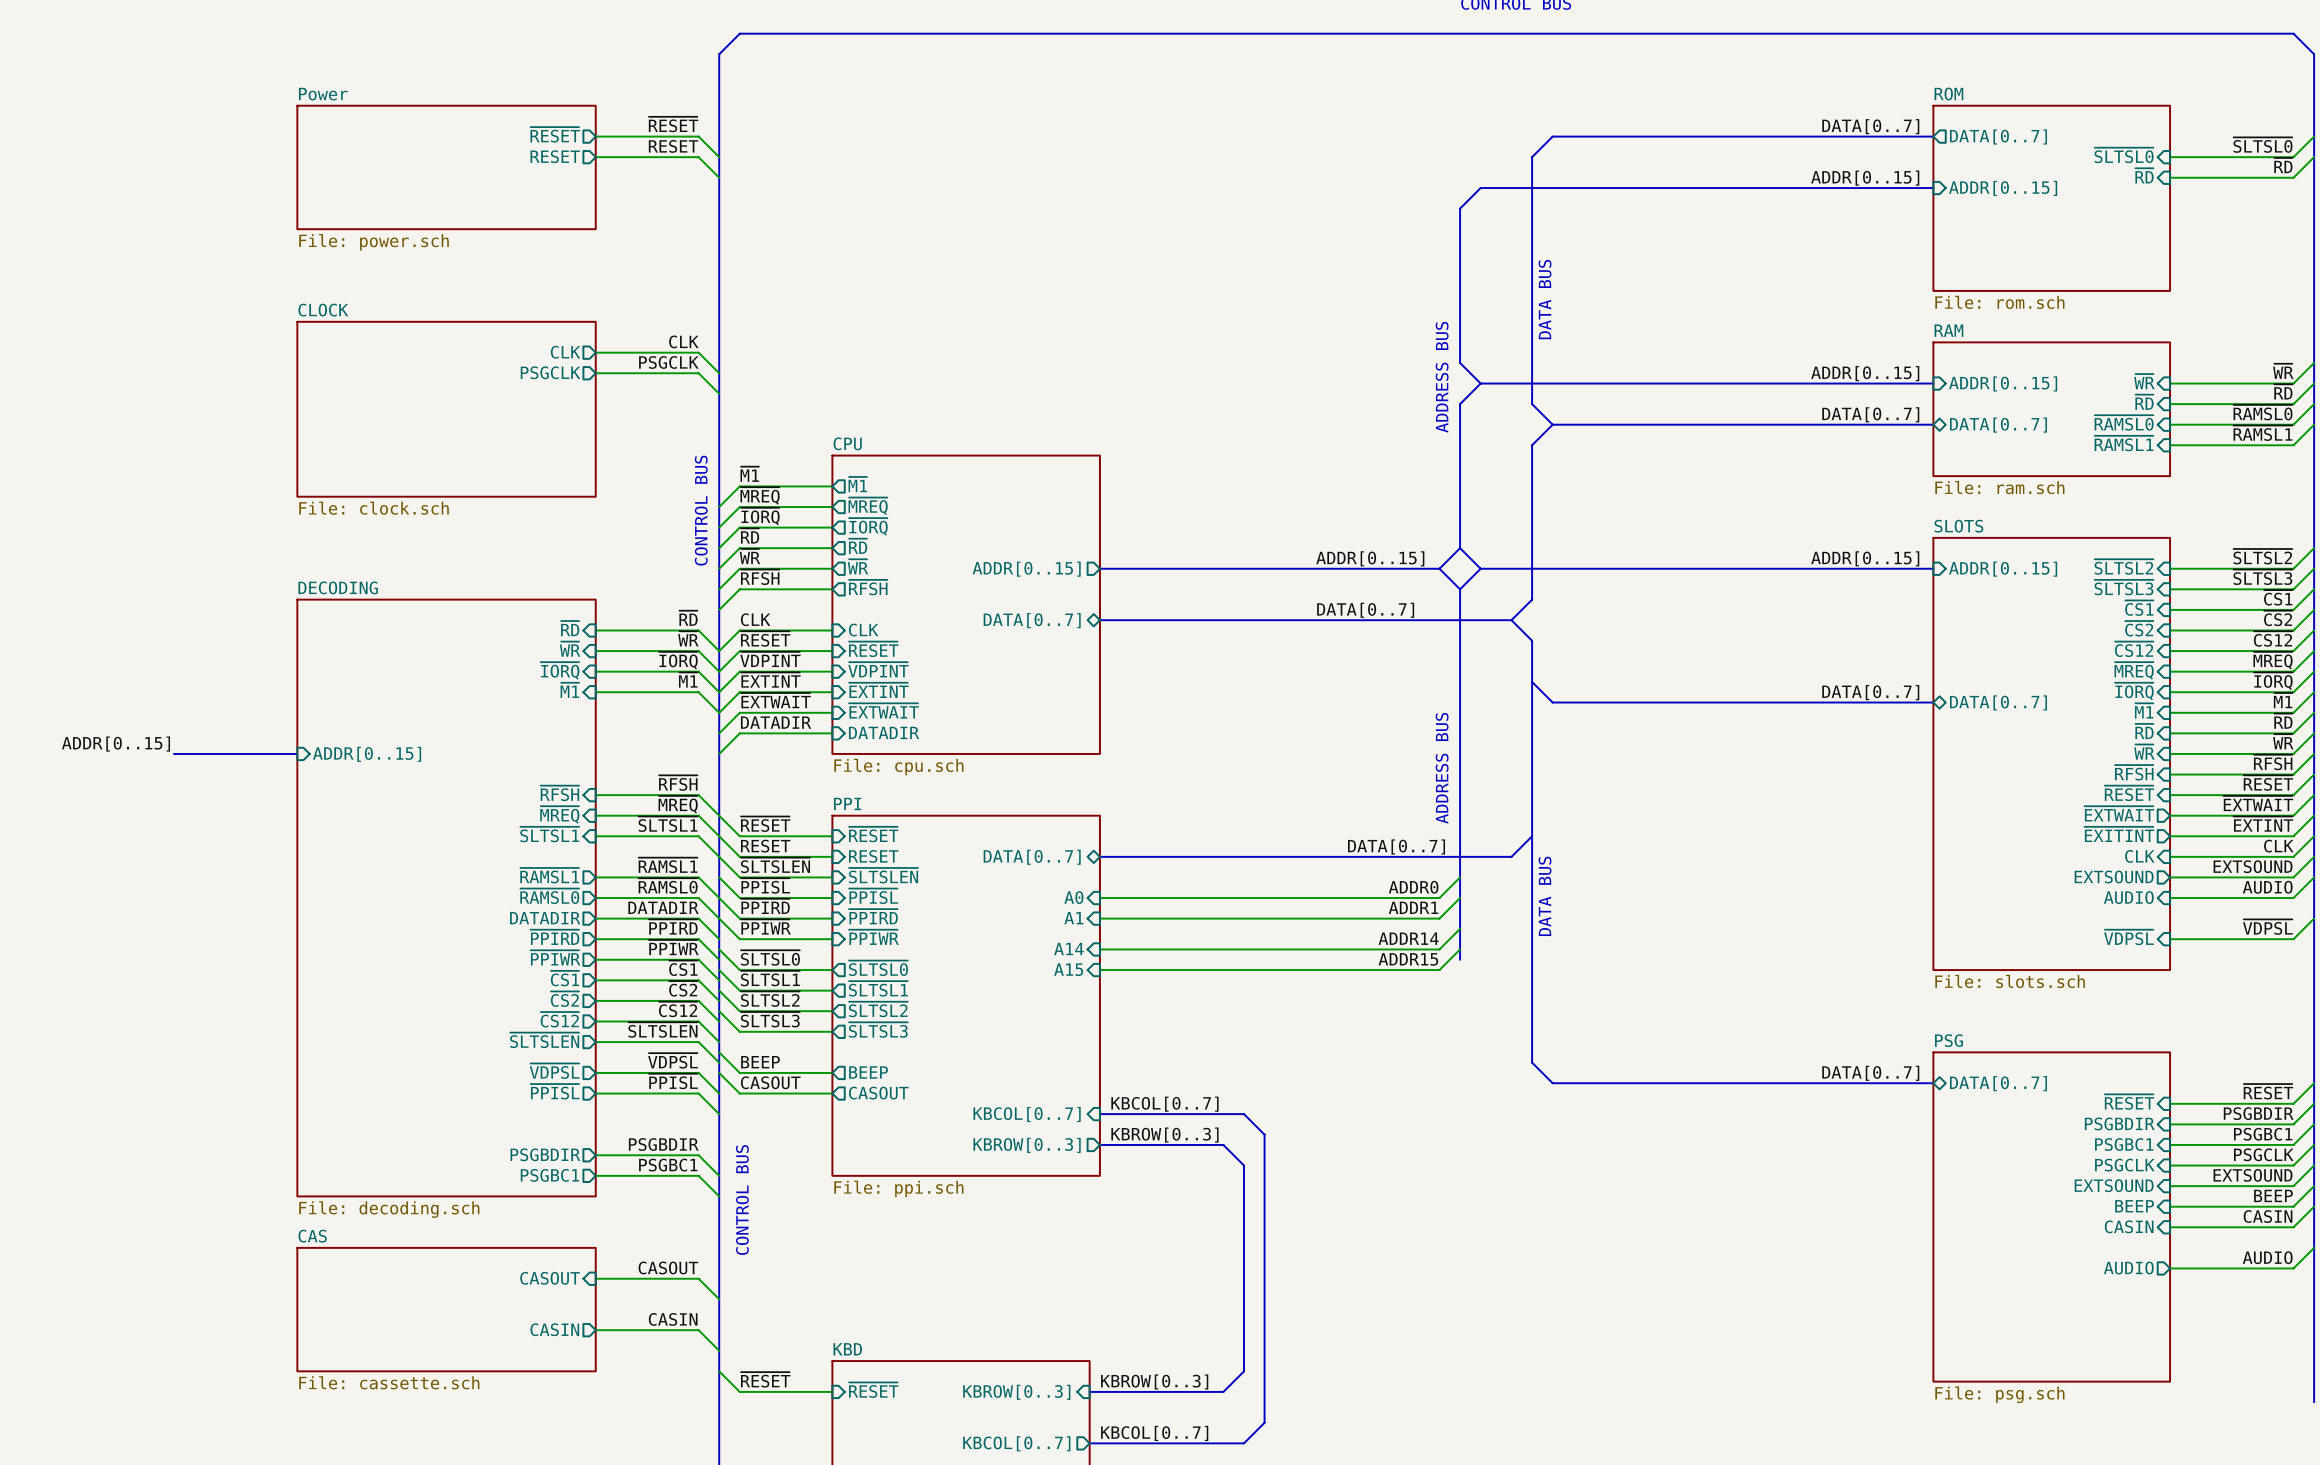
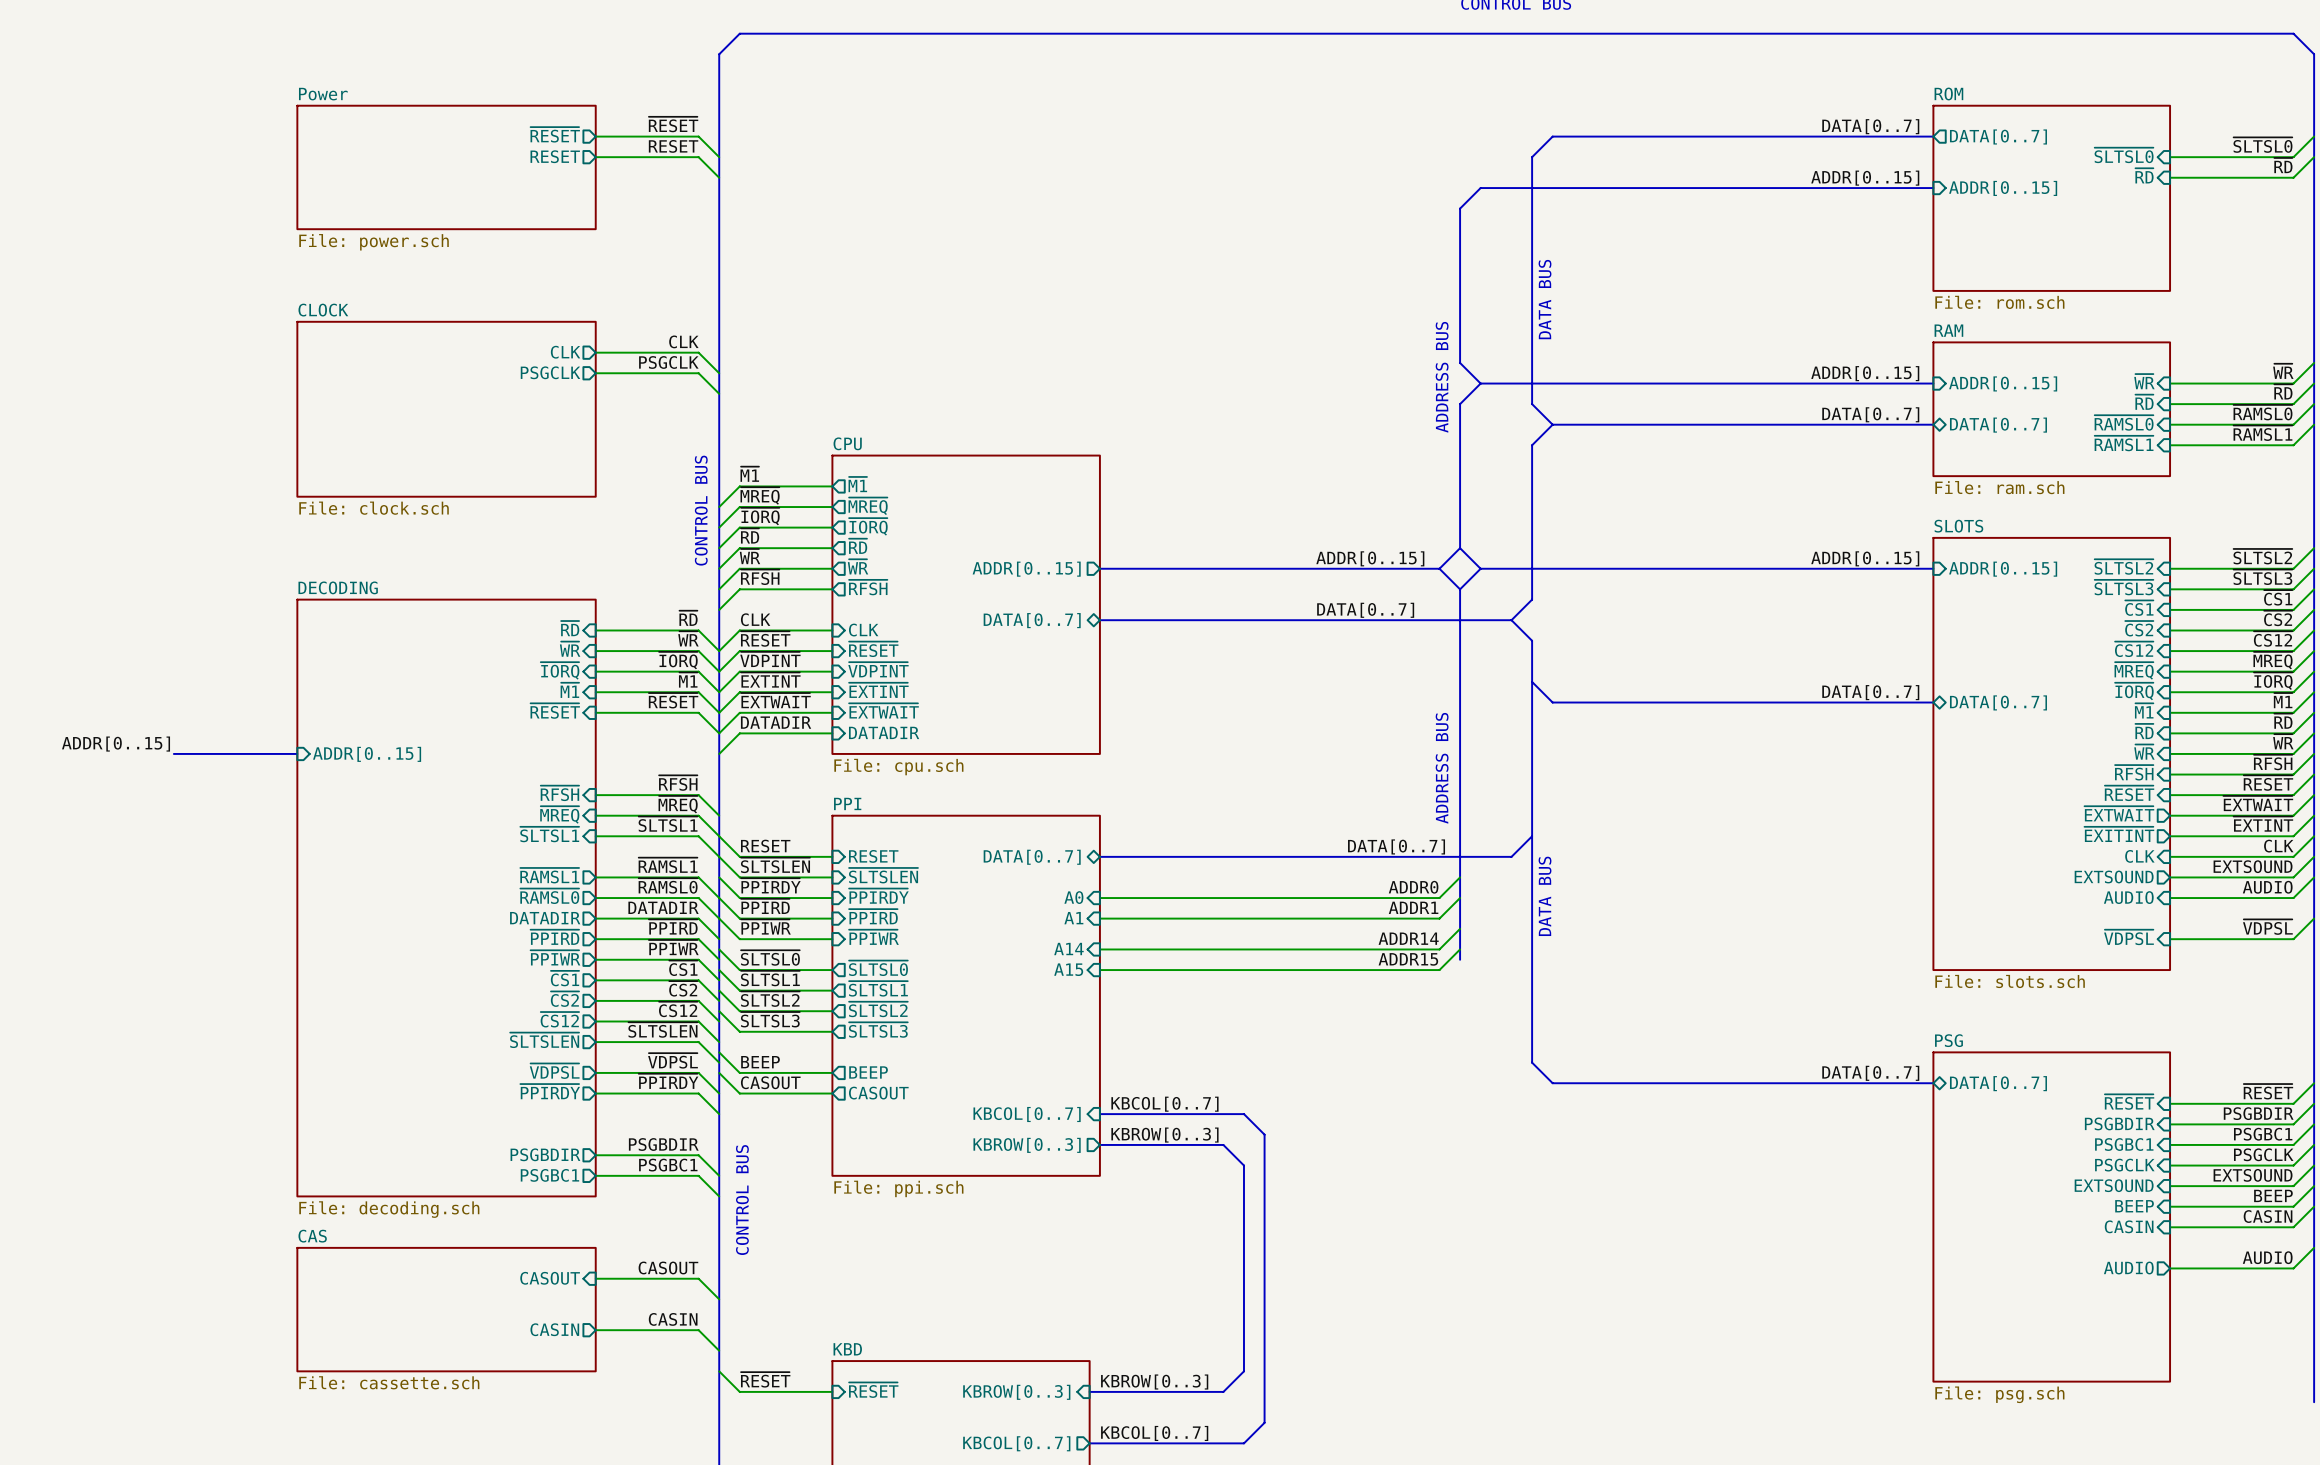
sheet pin: none -> ~{RESET} (555, 711)
wire: none -> (595, 712) (698, 712) (719, 733)
wire: (719, 815) (739, 836) (832, 836) -> none
label position: ~{RESET} (765, 824) -> ~{RESET} (673, 700)
sheet pin: ~{RESET} (873, 834) -> none
label: ~{PPISL} (765, 885) -> ~{PPIRDY} (770, 885)
sheet pin: ~{PPISL} (873, 896) -> ~{PPIRDY} (878, 896)
label: ~{PPISL} (673, 1081) -> ~{PPIRDY} (668, 1081)
sheet pin: ~{PPISL} (555, 1091) -> ~{PPIRDY} (550, 1091)

